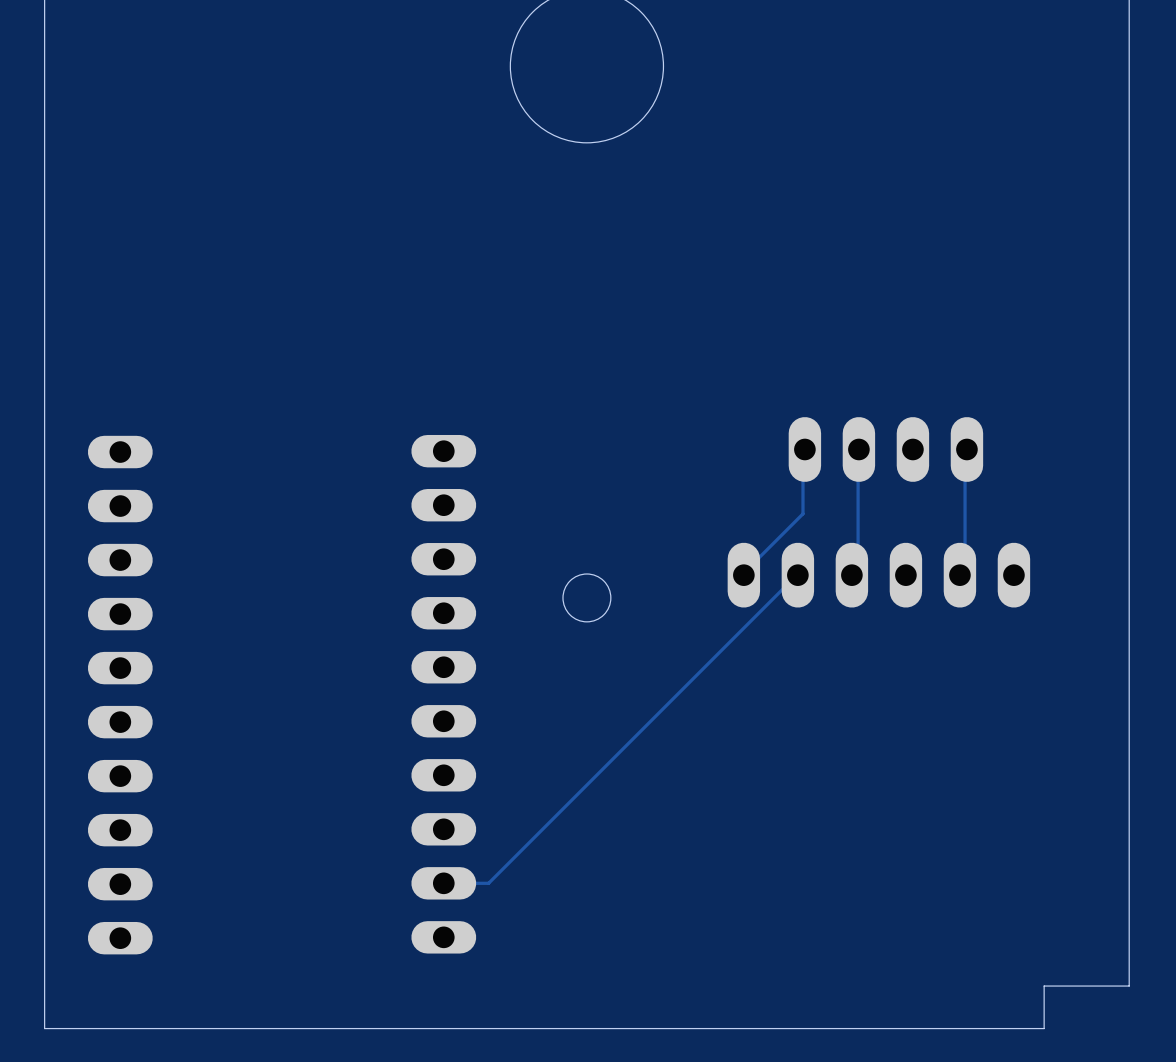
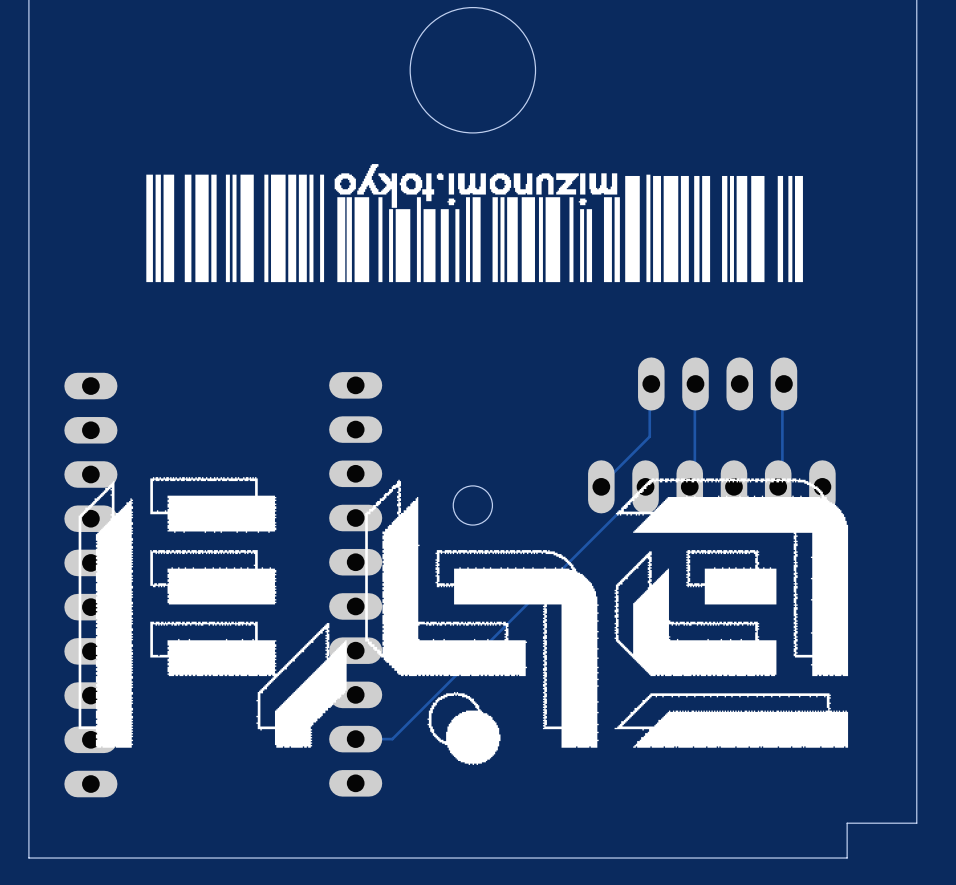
drawing: none -> [146, 164, 803, 283]
drawing: none -> [78, 477, 849, 765]

